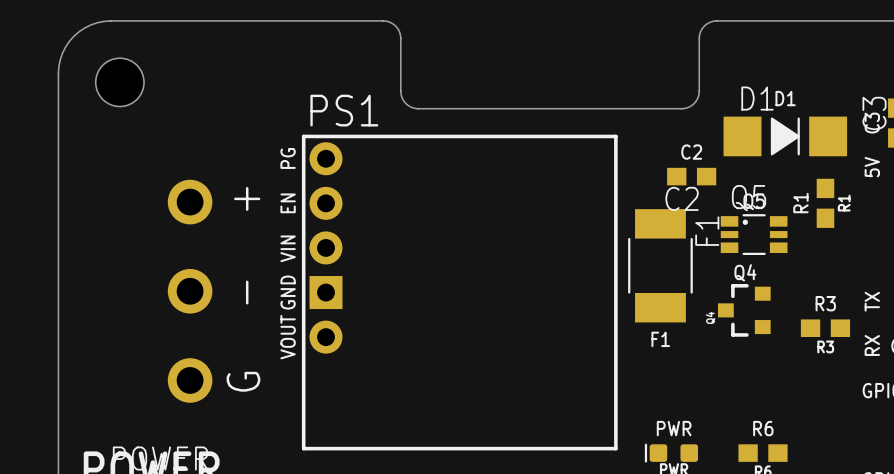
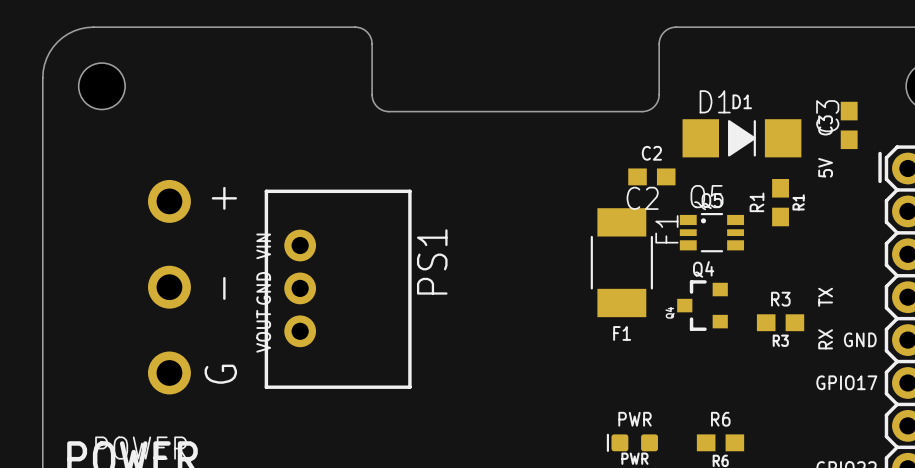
PS1 name position: PS1 (344, 110) -> PS1 (432, 261)
PS1 footprint: [301, 134, 618, 451] -> [264, 189, 412, 389]
text: PG (288, 158) -> none
text: EN (288, 203) -> none

